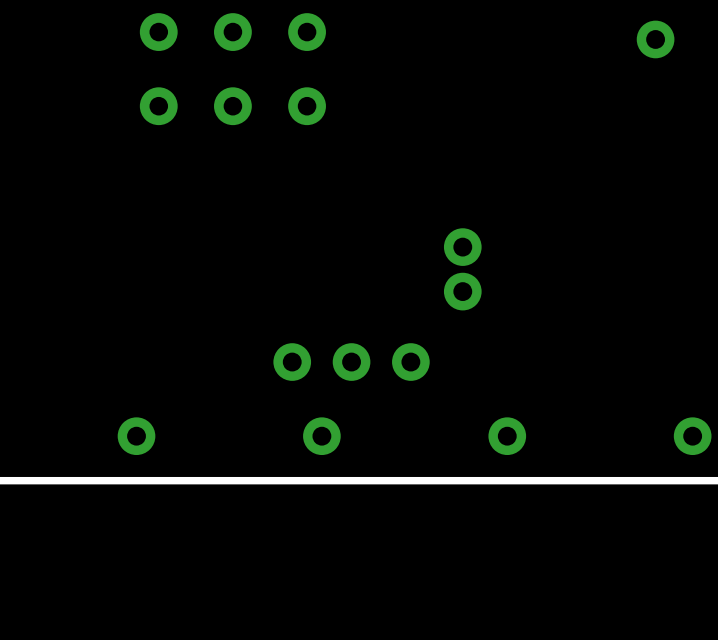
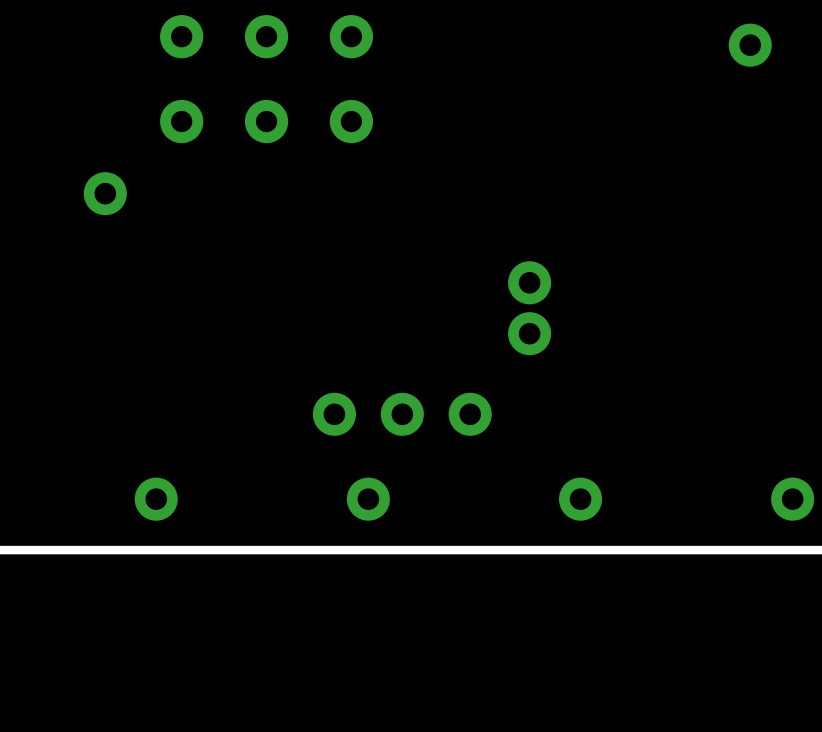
via: none -> (105, 193)

